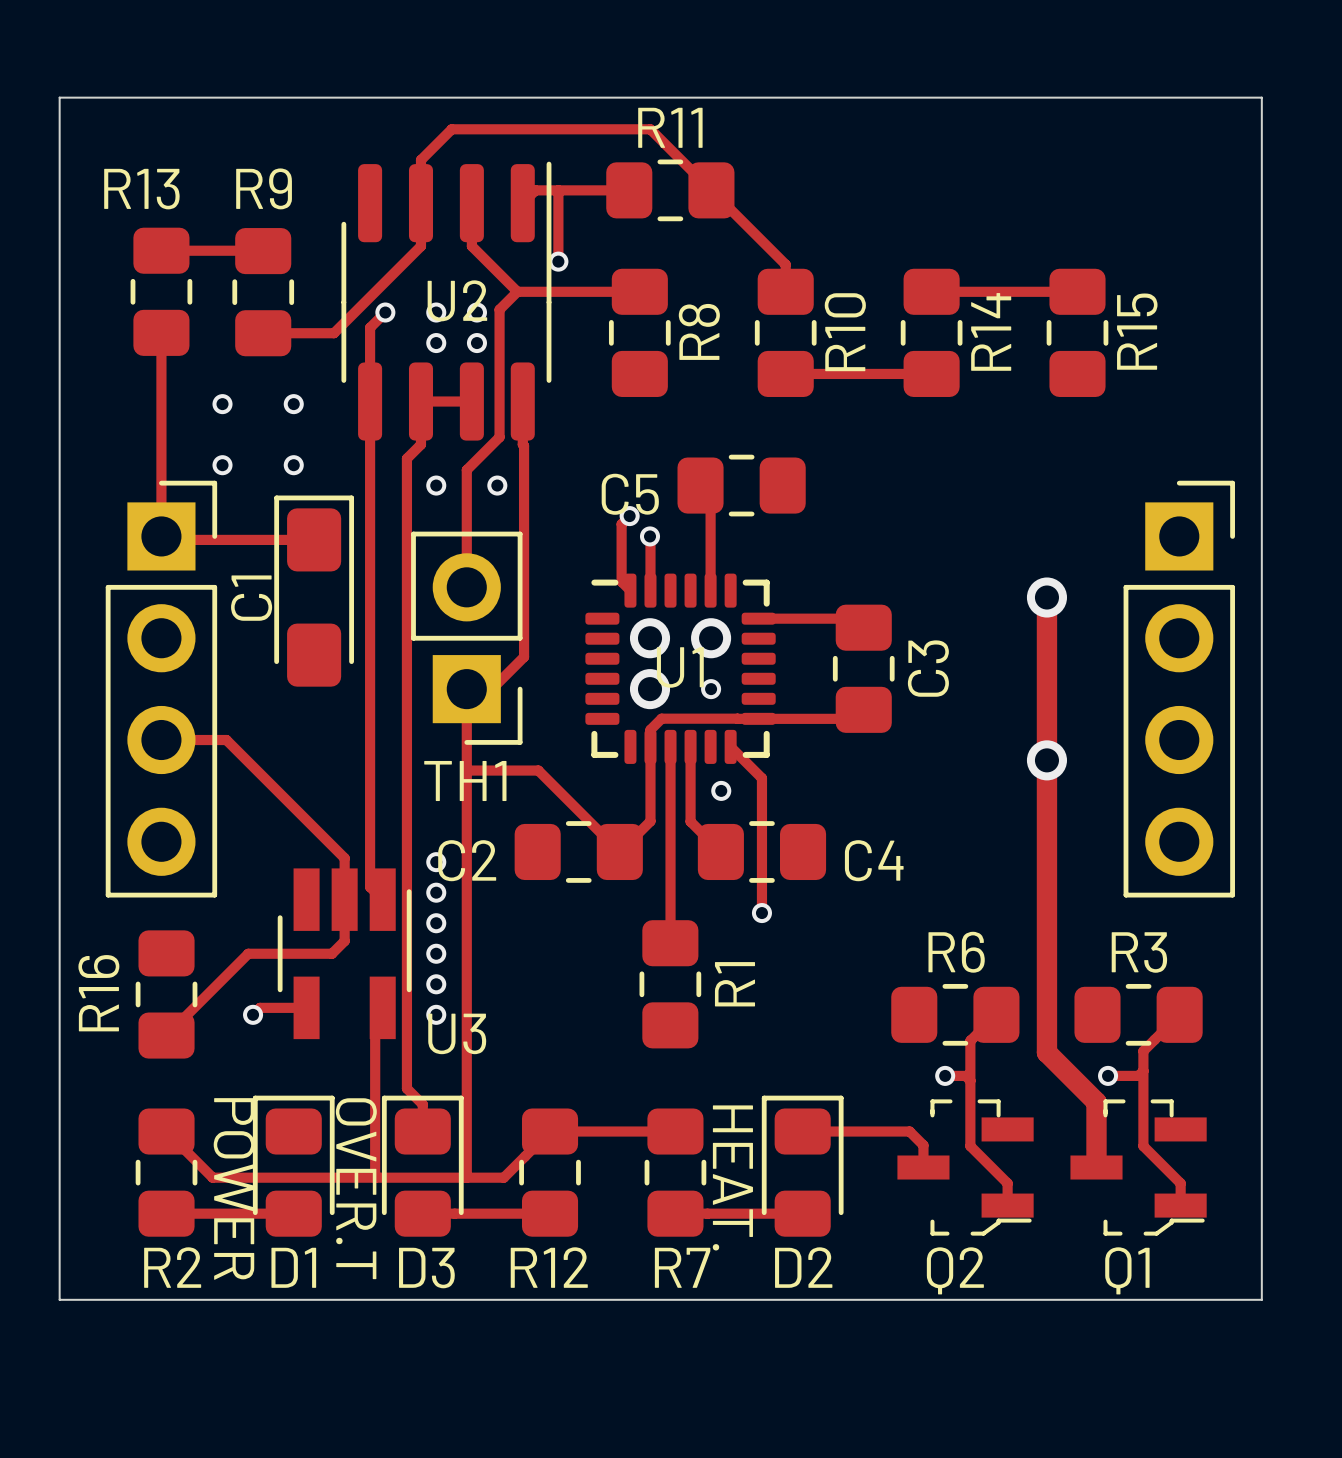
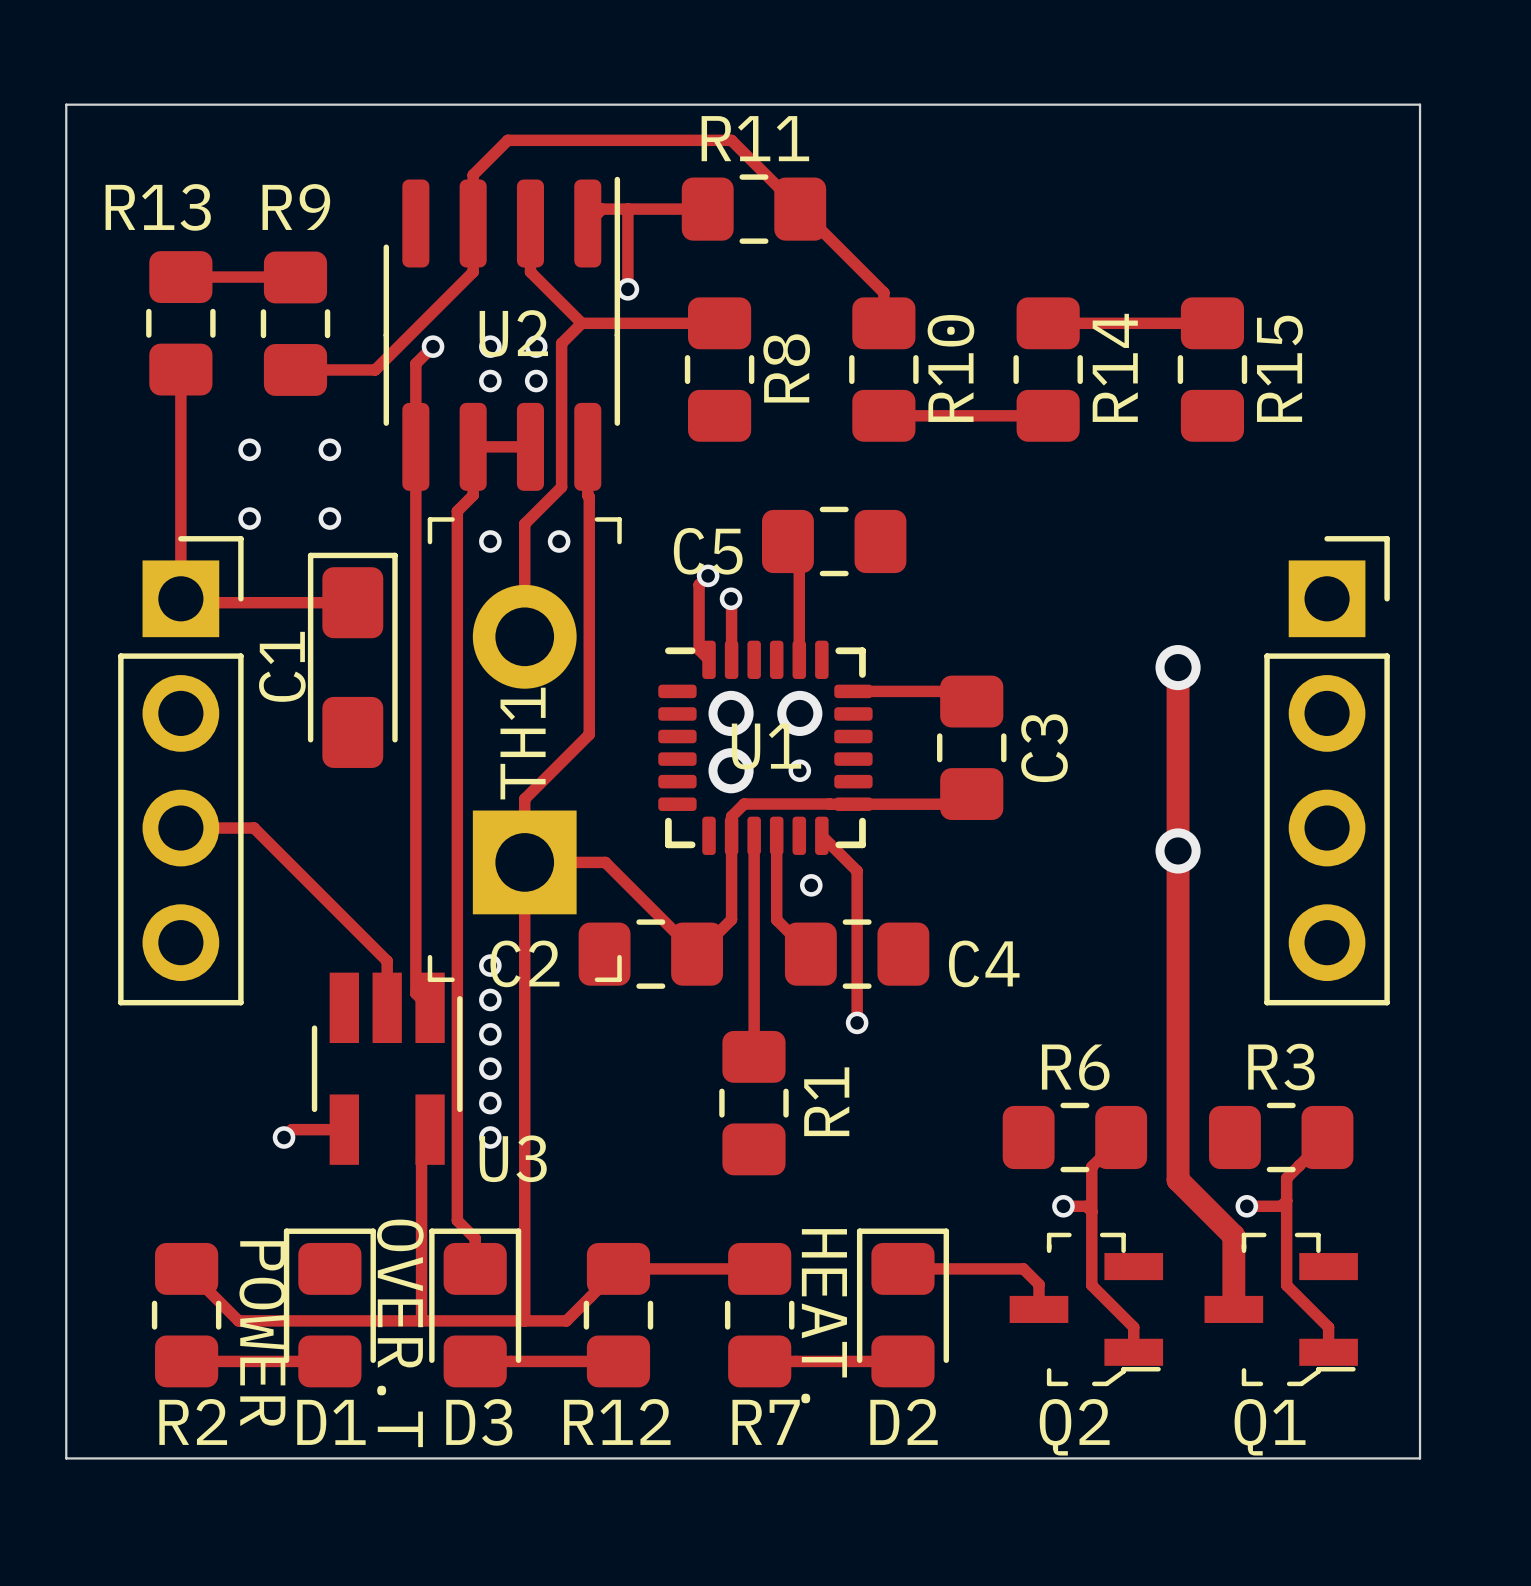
TH1 footprint: [411, 531, 523, 745] -> [427, 517, 622, 983]
TH1 name position: TH1 (465, 780) -> TH1 (523, 743)
track: (344, 899) (344, 941) (331, 953) (248, 953) (166, 1035) -> none
R16: (166, 994) -> none

